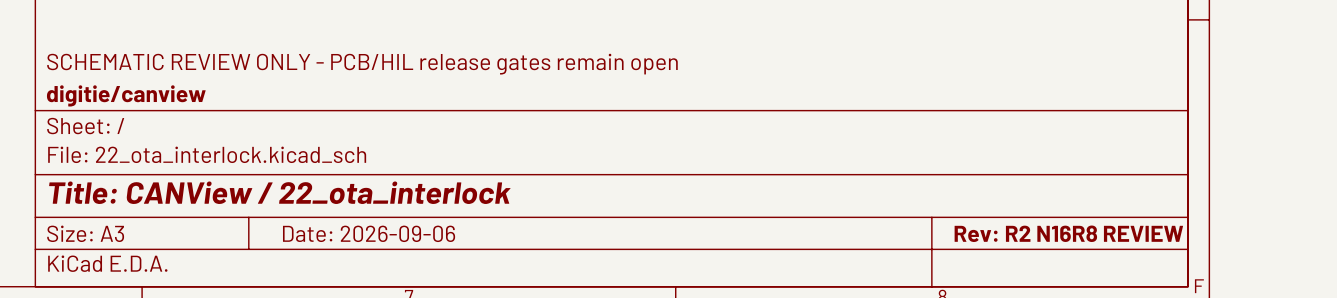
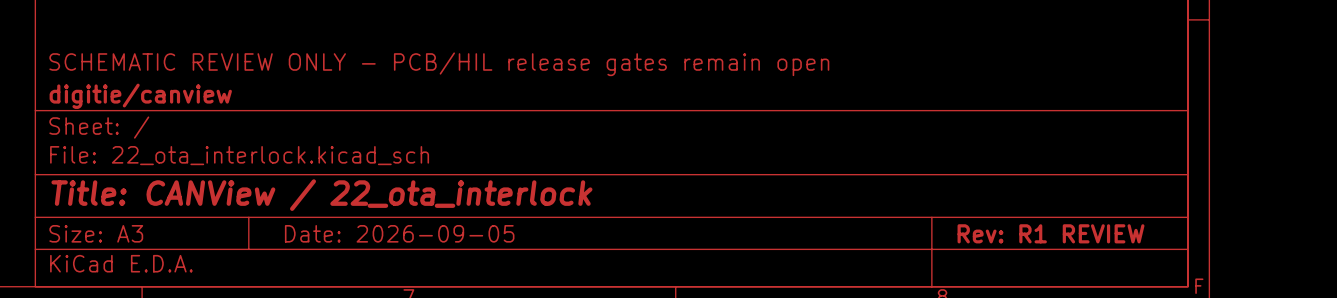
title block: Date: 2026-09-06 (369, 233) -> Date: 2026-09-05 (399, 233)
title block: Rev: R2 N16R8 REVIEW (1068, 233) -> Rev: R1 REVIEW (1050, 233)

